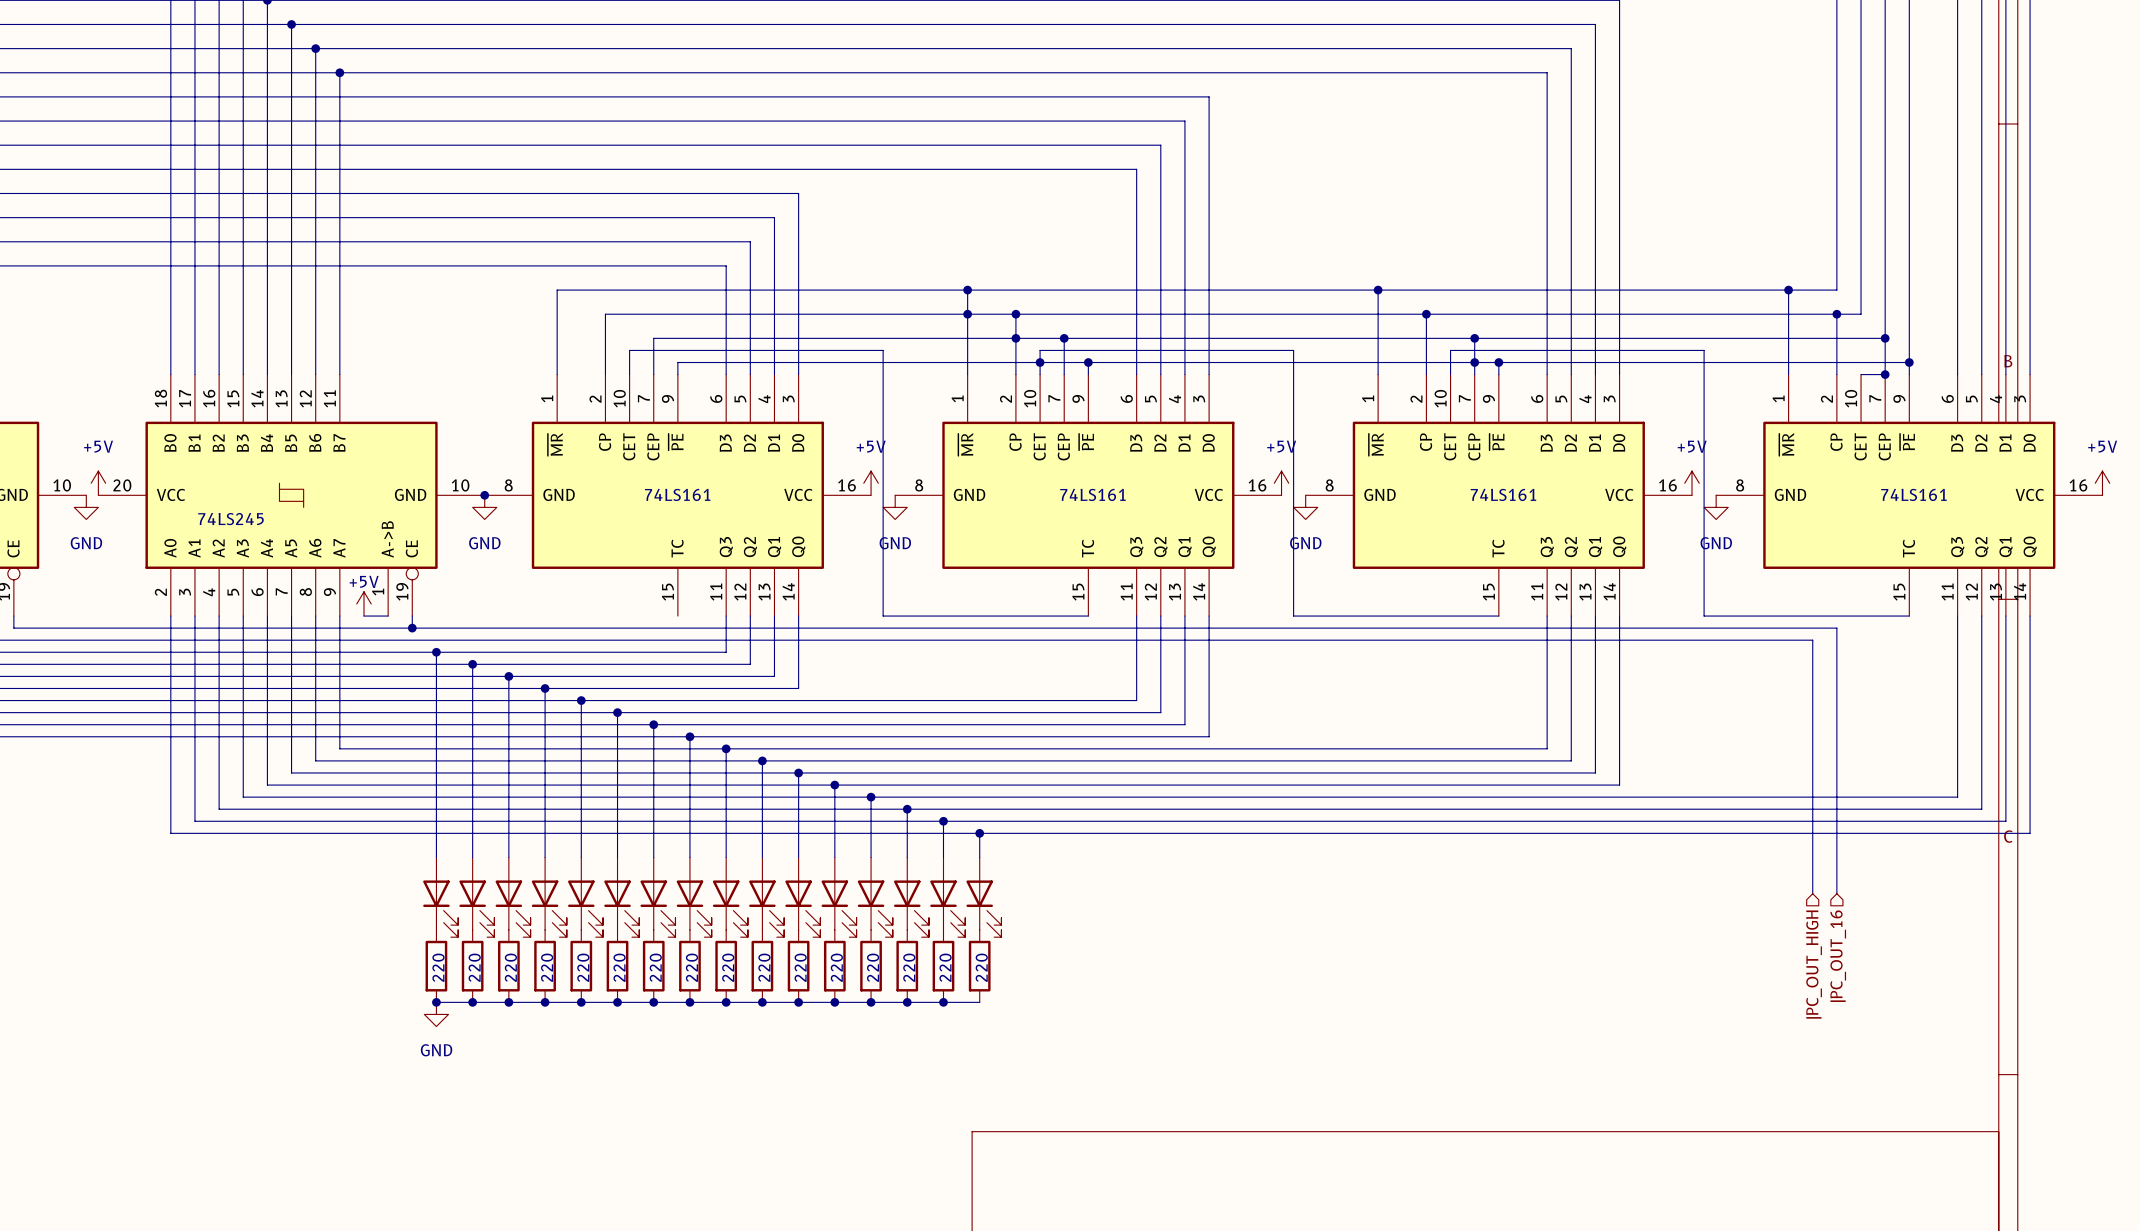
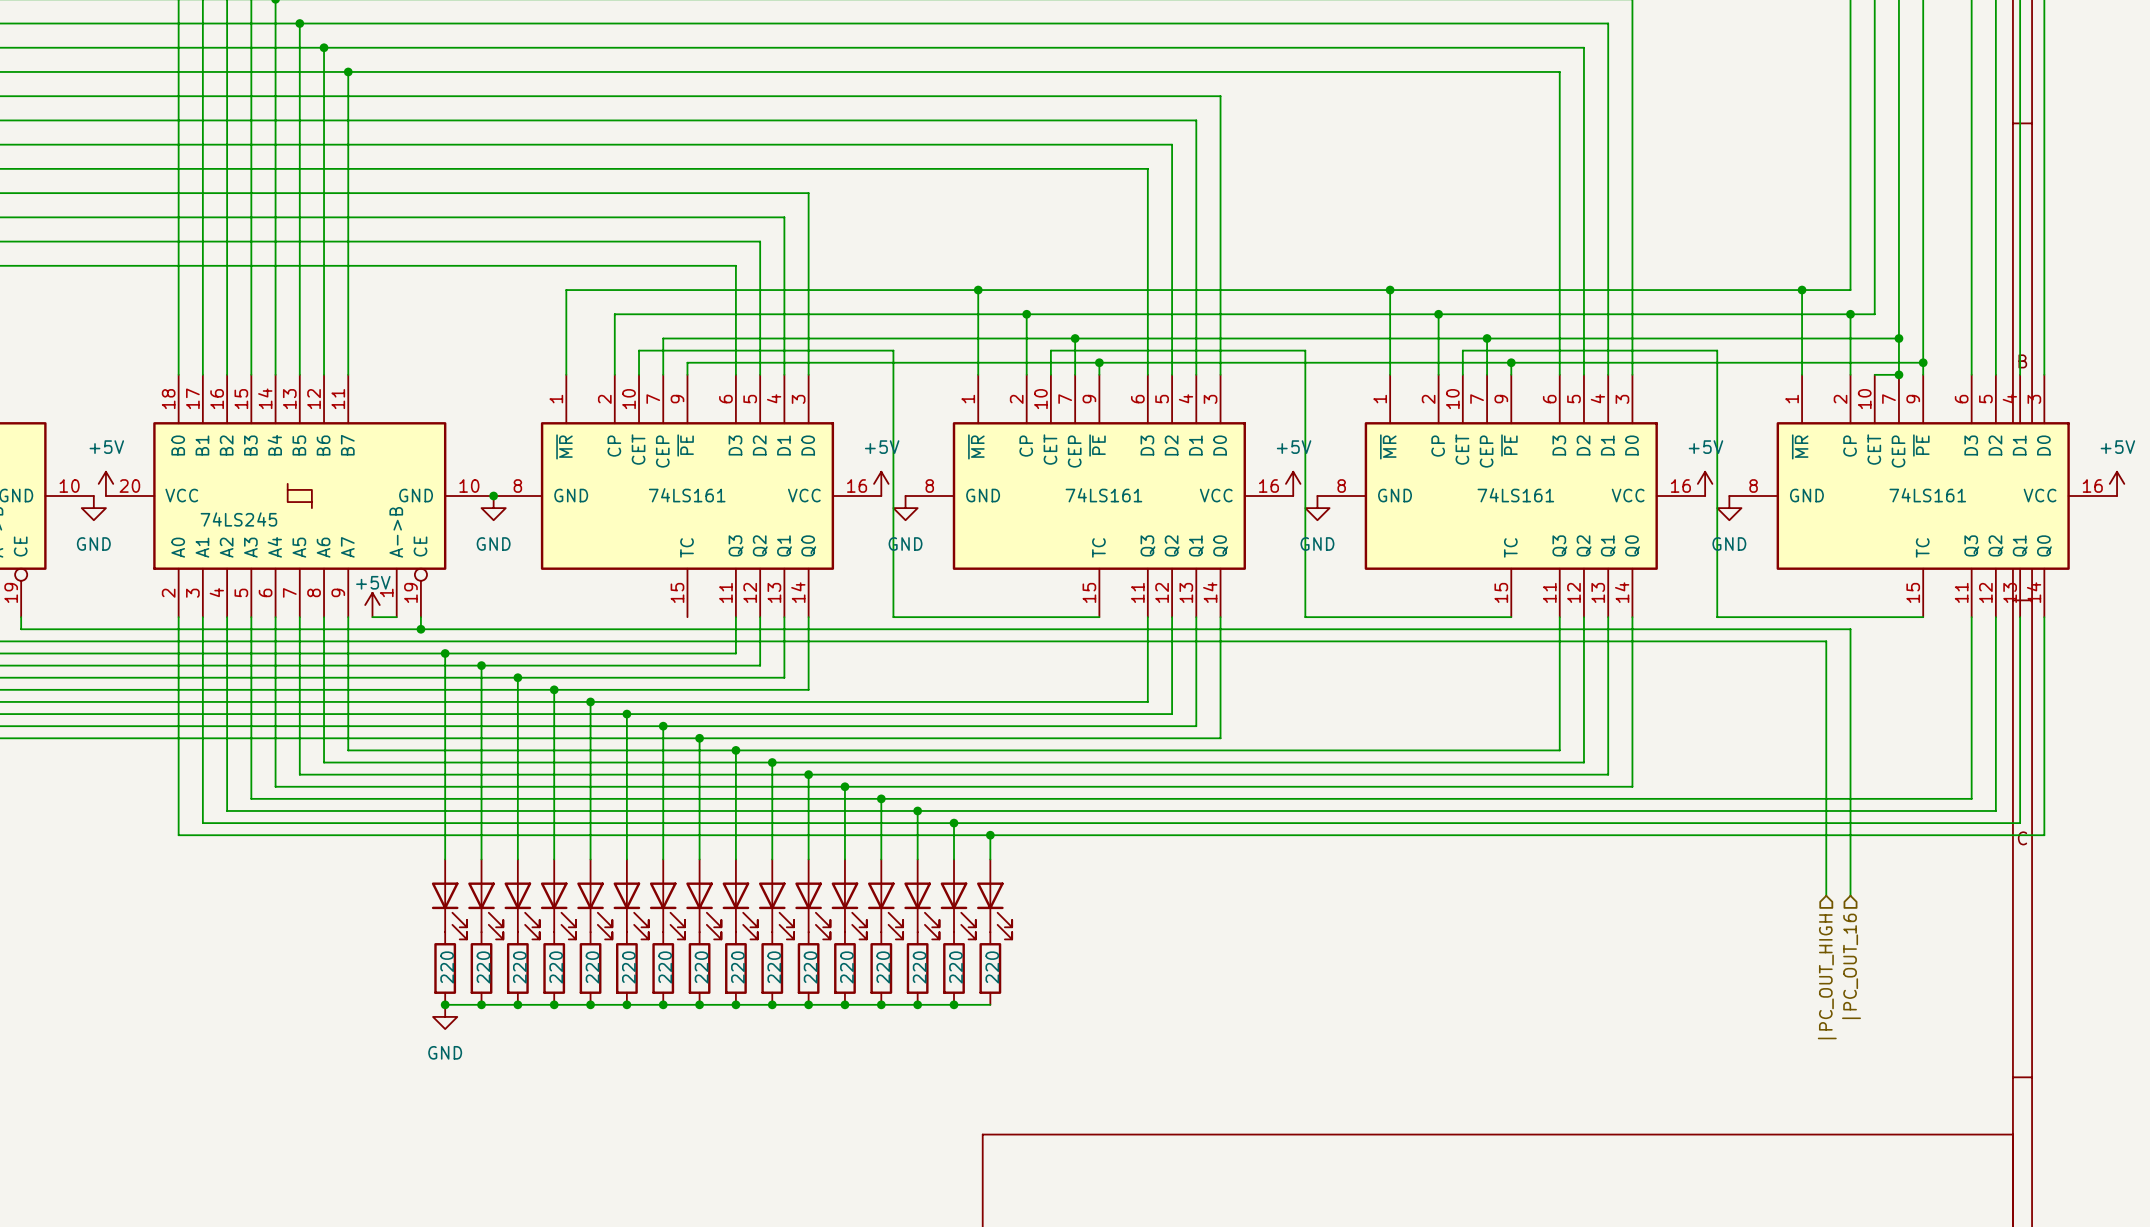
junction: (967, 314) -> none
junction: (1015, 338) -> none
junction: (1040, 362) -> none
junction: (1474, 362) -> none

